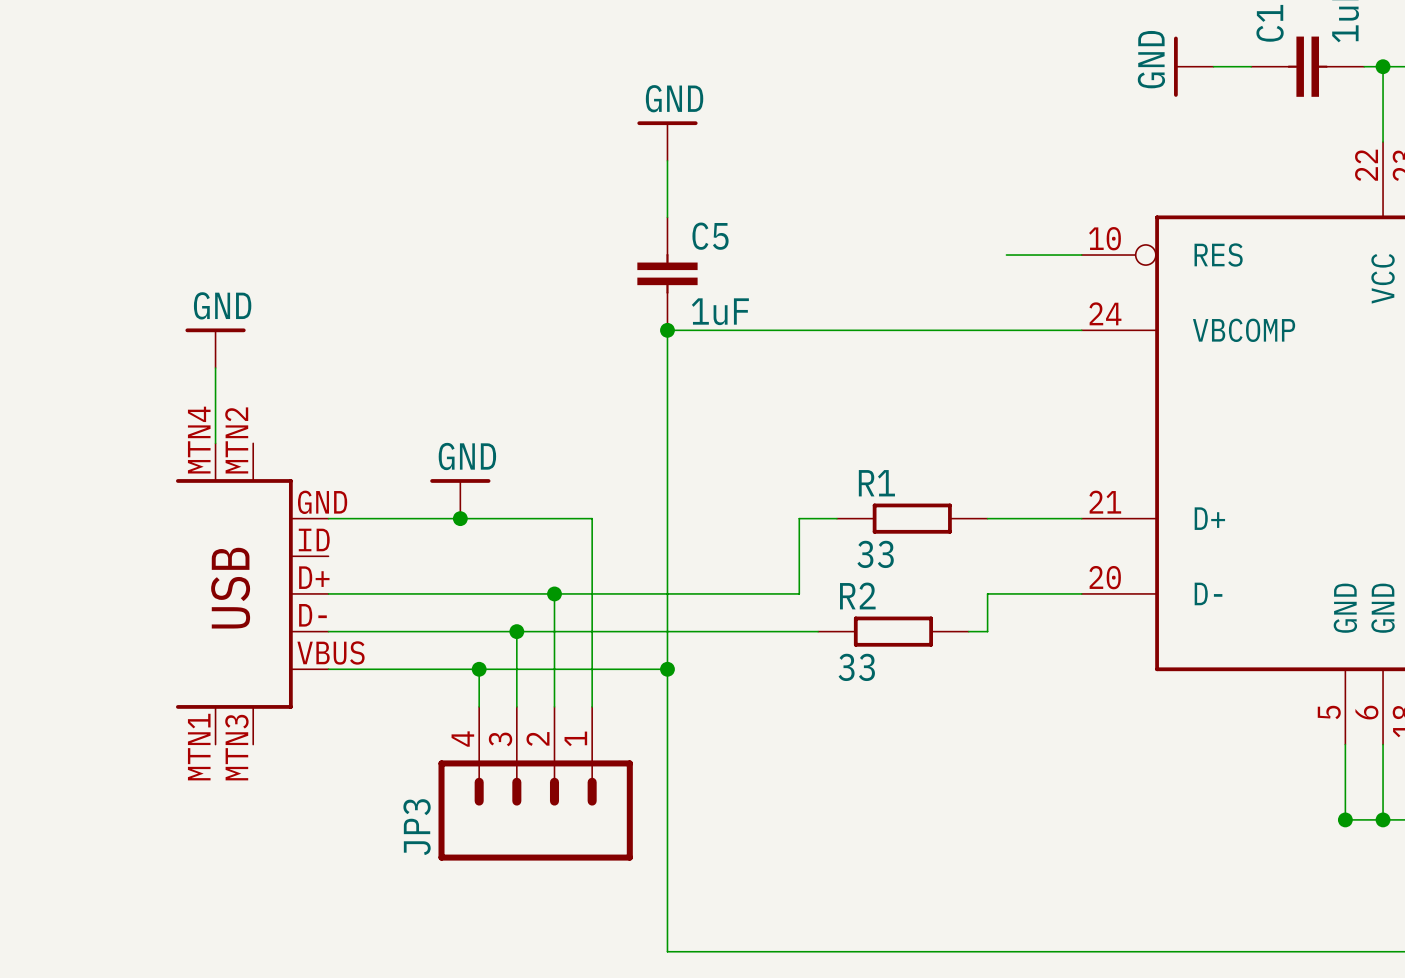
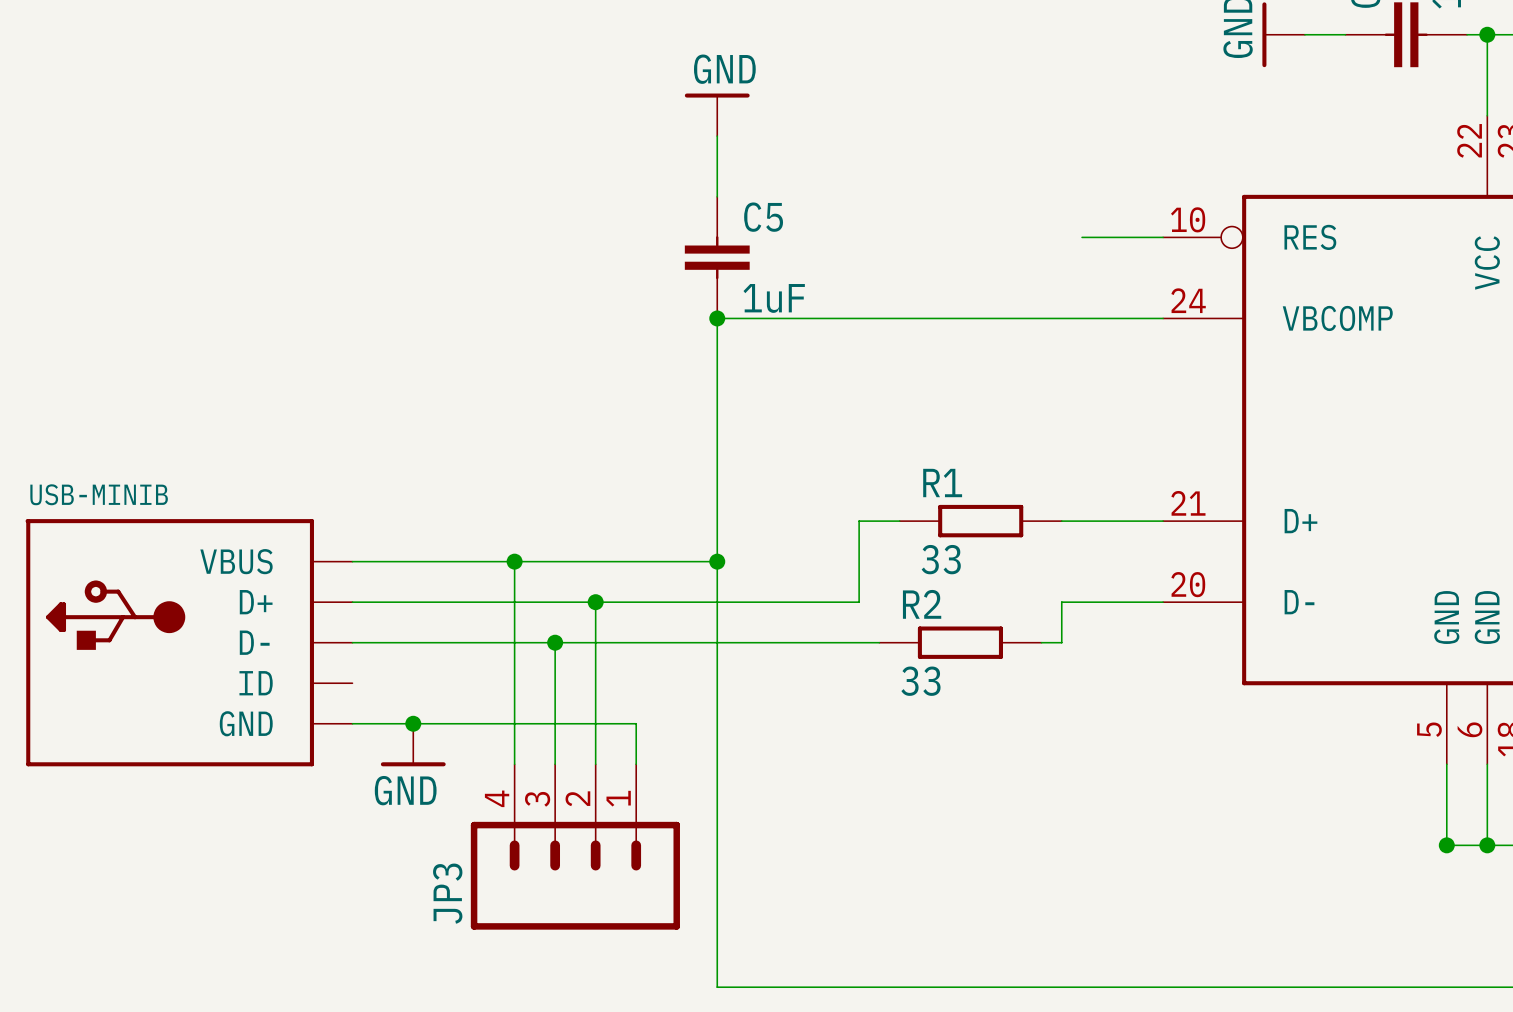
power symbol: GND (215, 348) -> none
wire: (215, 367) (215, 443) -> none
power symbol: GND (460, 498) -> none
wire: (328, 518) (592, 518) (592, 706) -> none
junction position: (460, 518) -> (514, 561)
wire: none -> (514, 561) (514, 683)
junction: none -> (717, 561)
part: (252, 593) -> none
USB-MINIB: none -> (189, 642)
wire: (328, 669) (667, 669) -> (352, 561) (717, 561)
junction: (479, 669) -> none
junction: (667, 669) -> none
wire: none -> (352, 723) (636, 723) (636, 764)
junction: none -> (413, 723)
power symbol: none -> GND (413, 745)
JP3 position: (535, 783) -> (575, 846)

